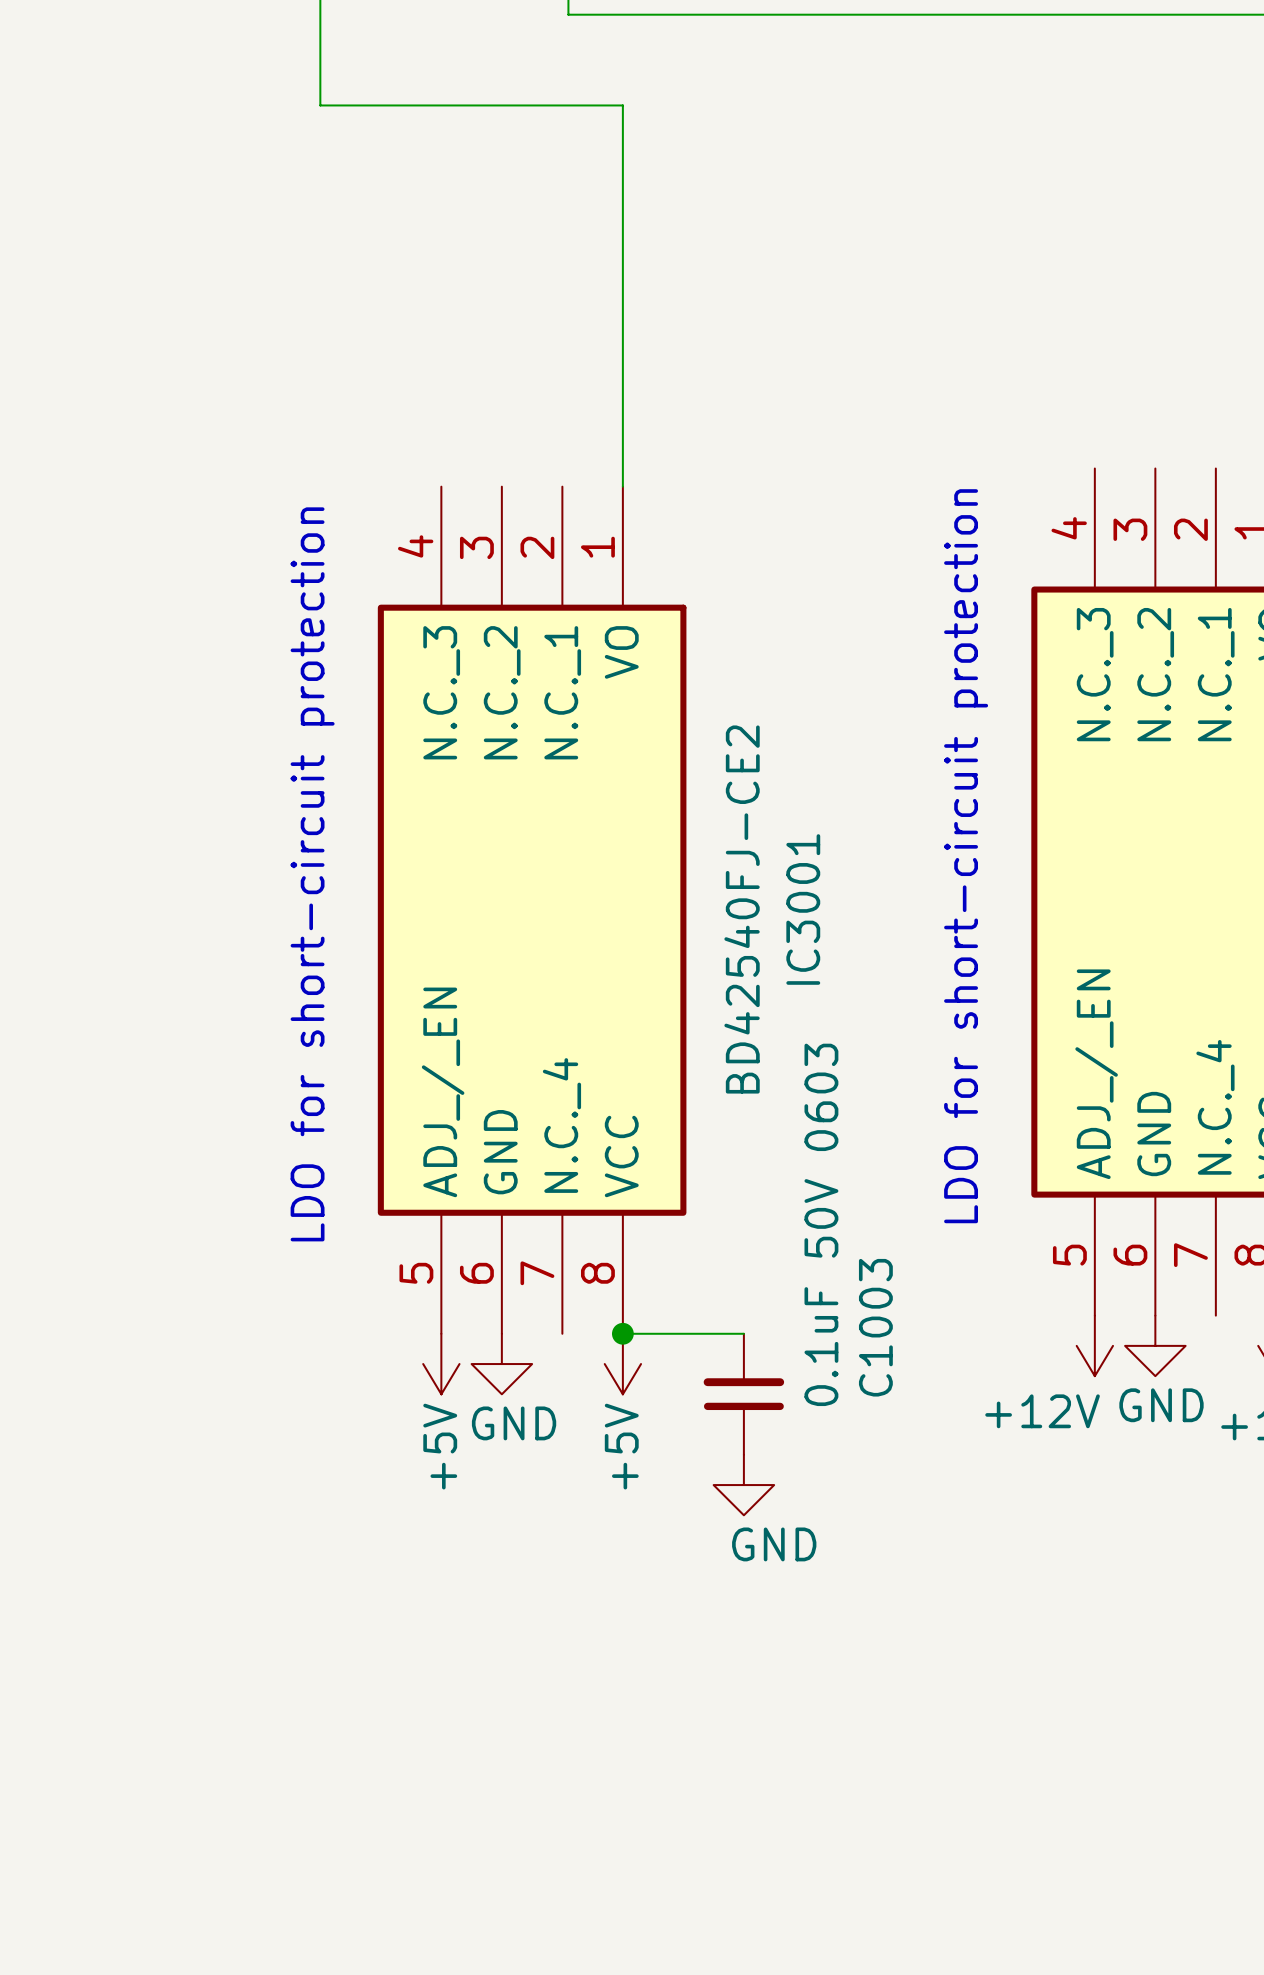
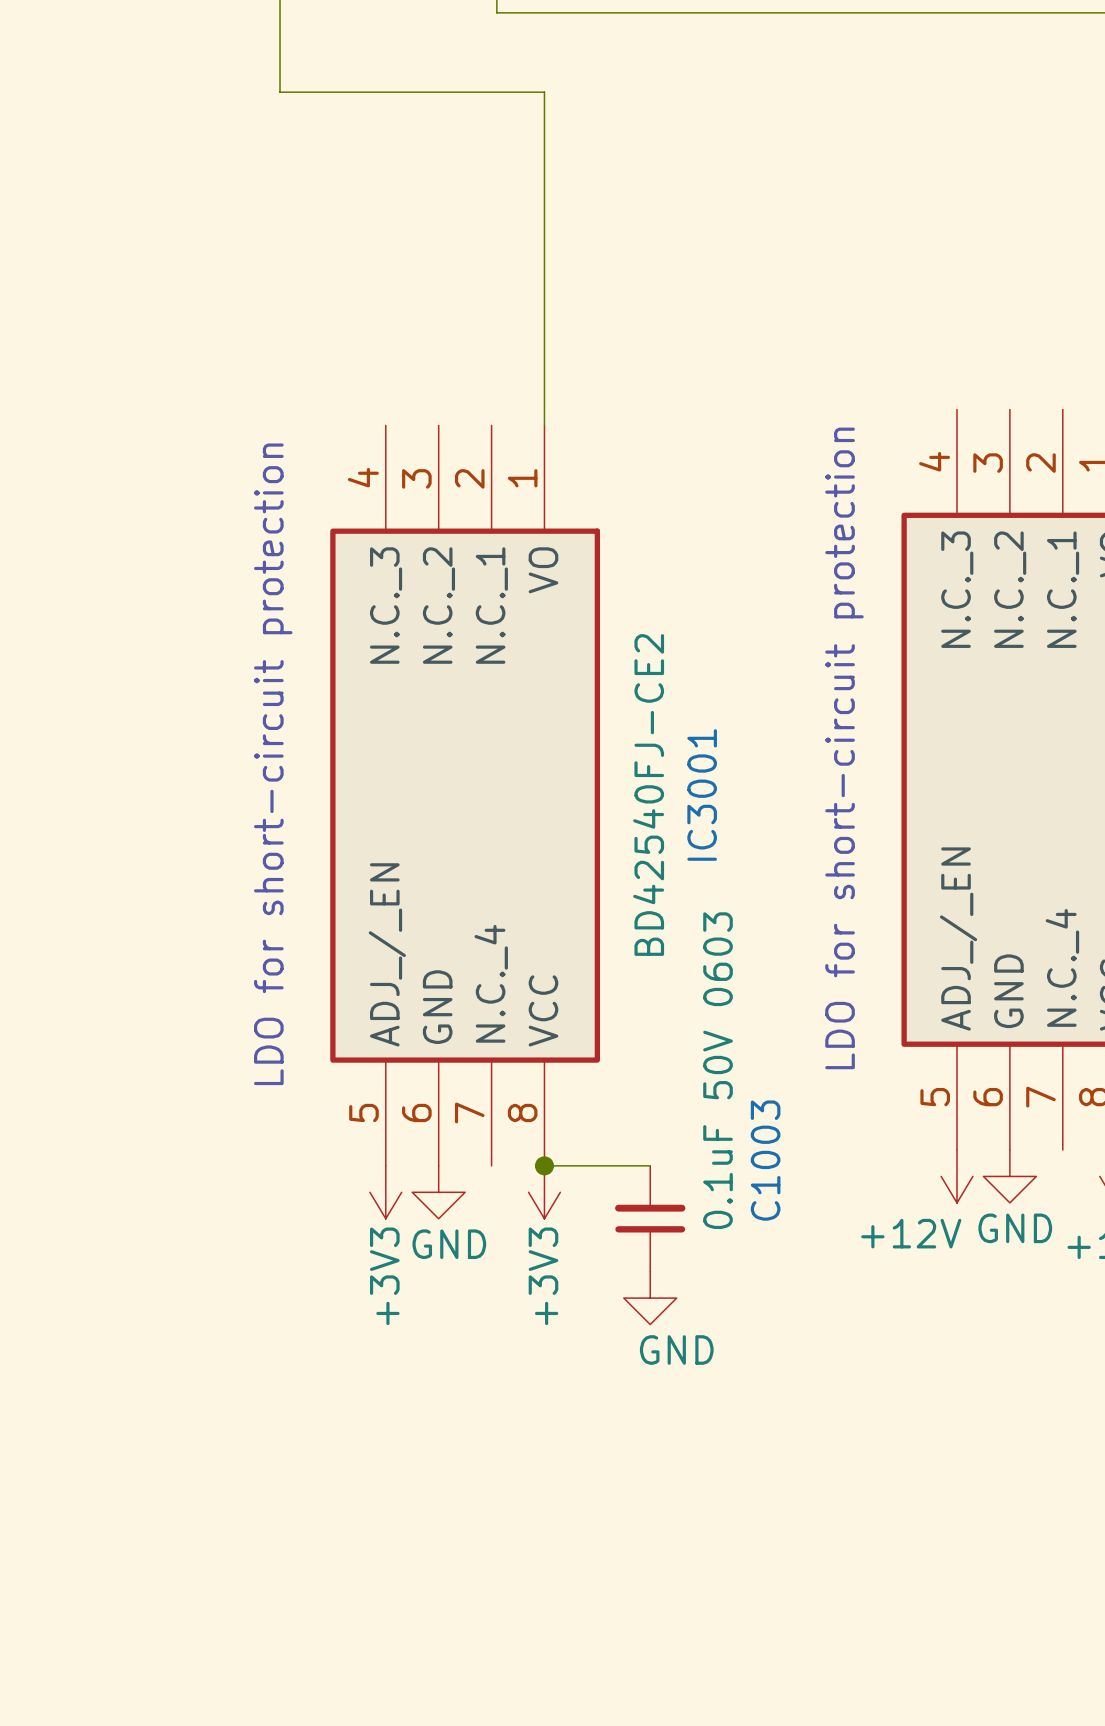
power symbol: +5V (441, 1364) -> +3V3 (385, 1192)
power symbol: +5V (622, 1364) -> +3V3 (544, 1192)

